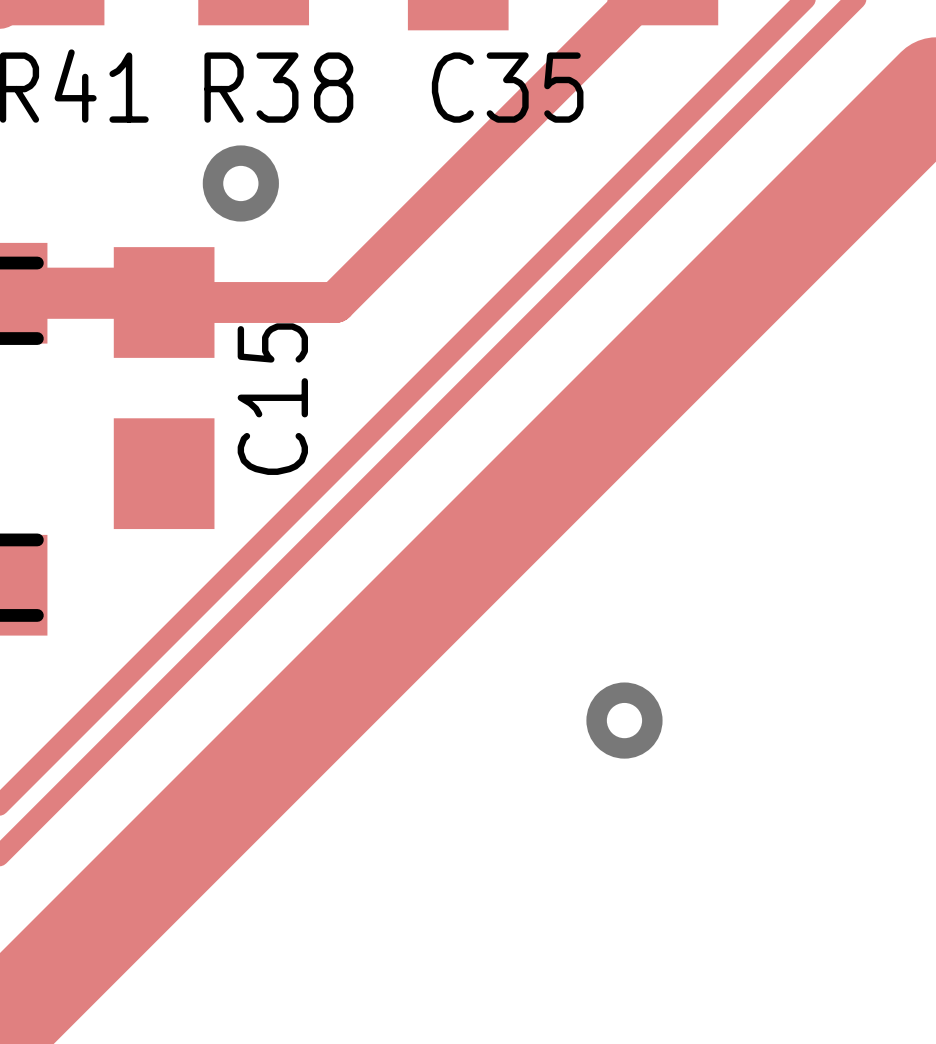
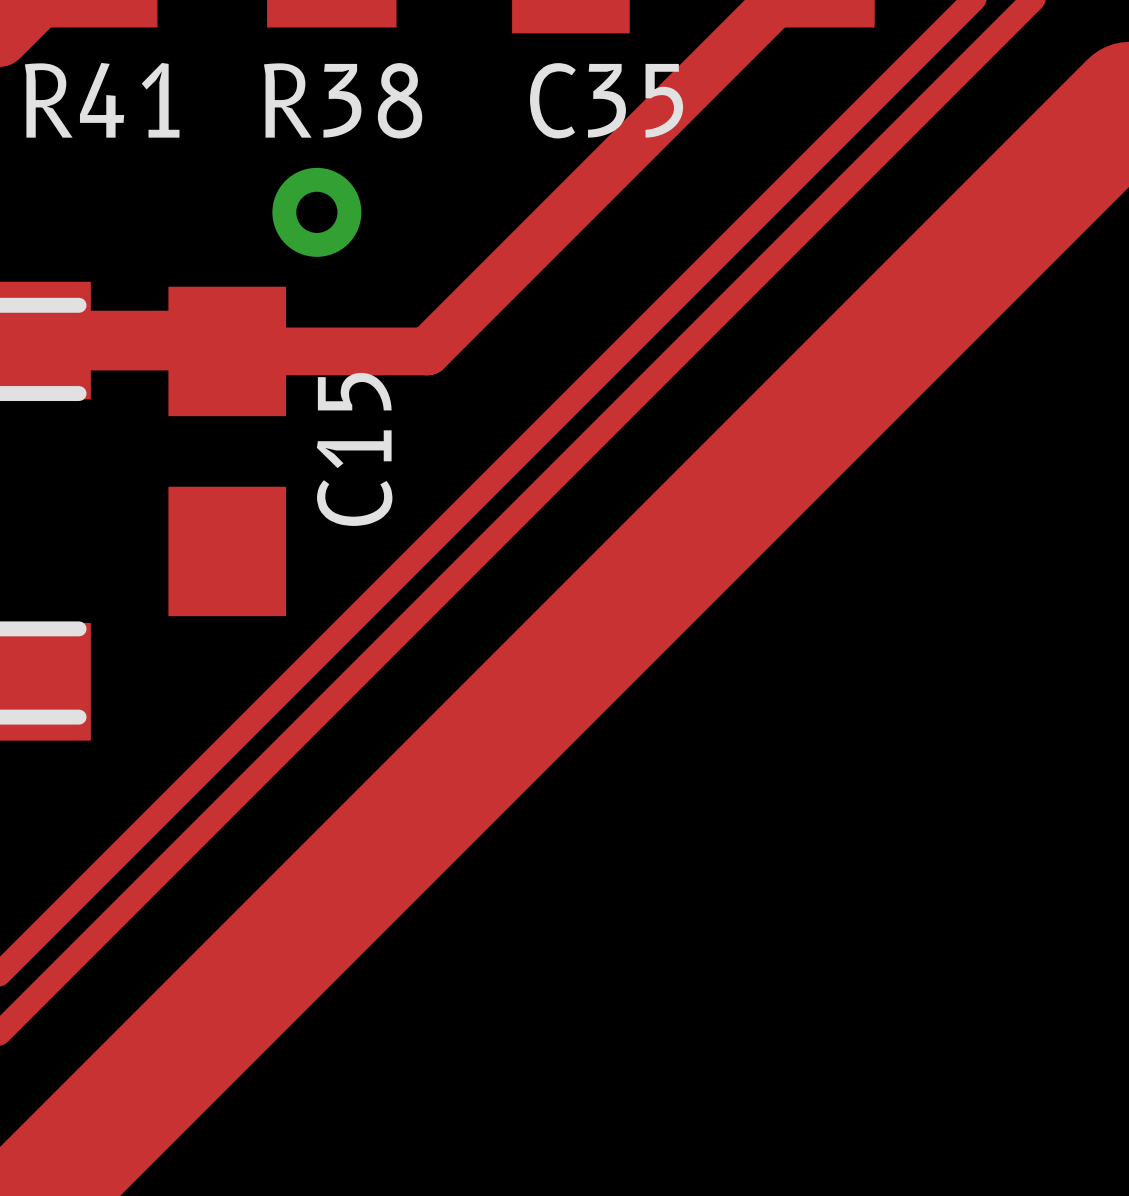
via: (624, 720) -> none

